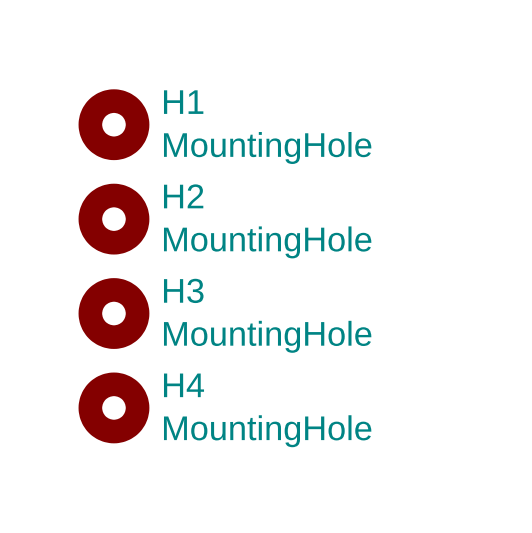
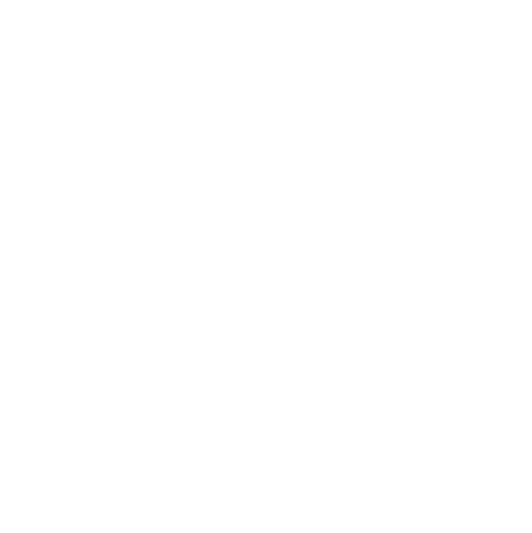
H1: MountingHole (113, 124) -> none
H2: MountingHole (113, 219) -> none
H3: MountingHole (113, 313) -> none
H4: MountingHole (113, 407) -> none

